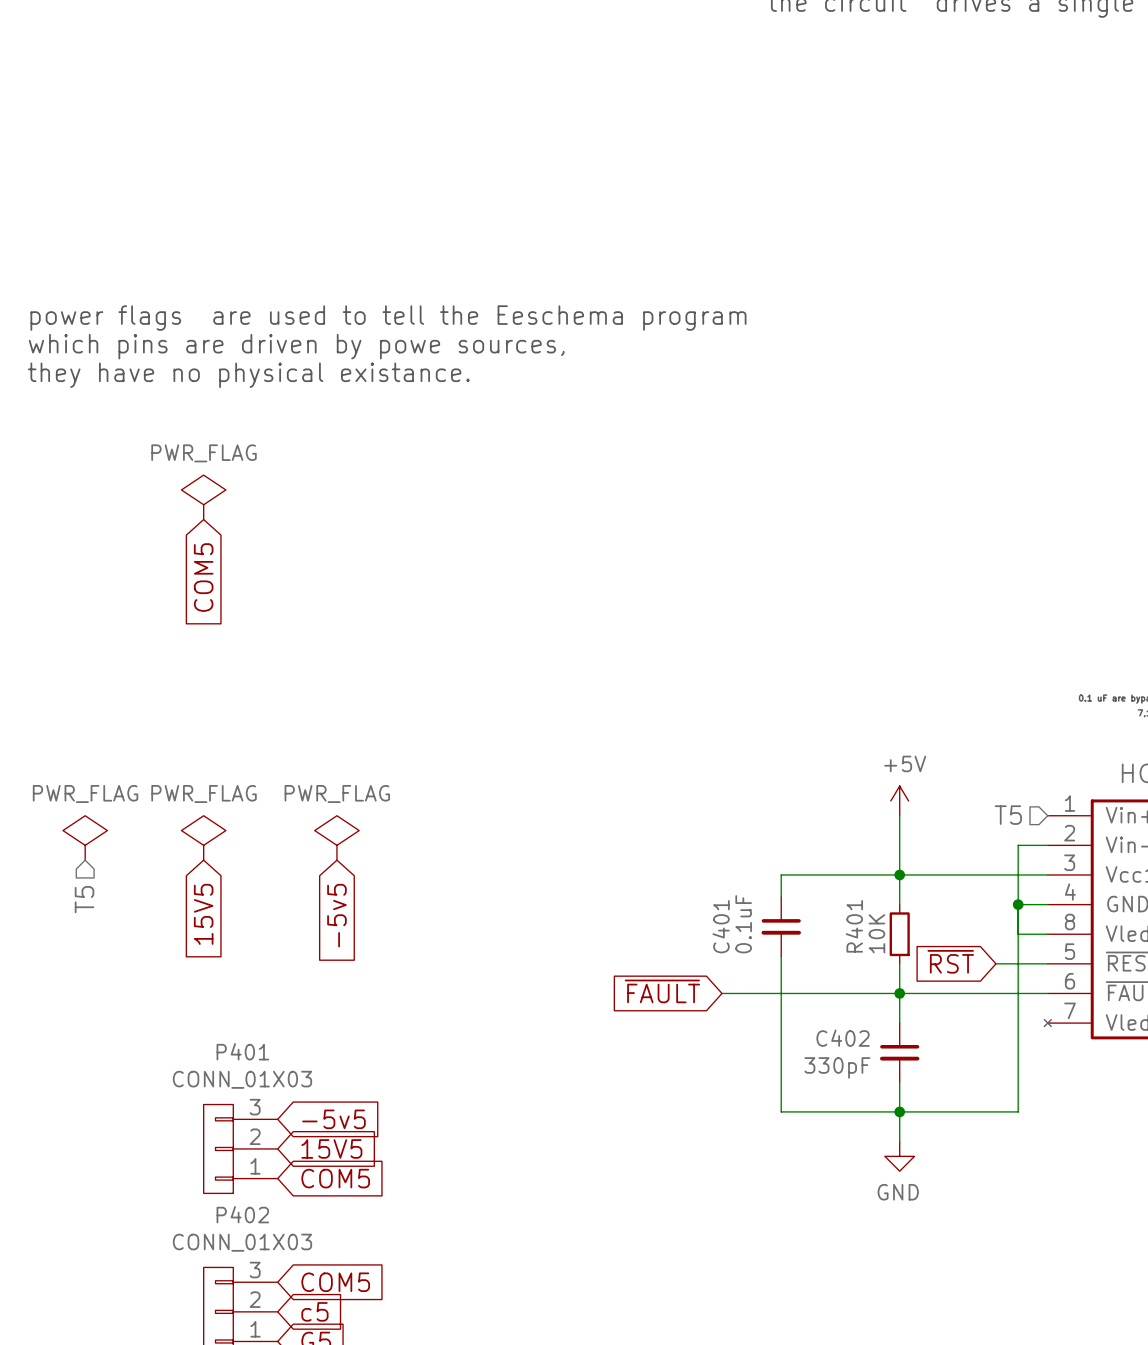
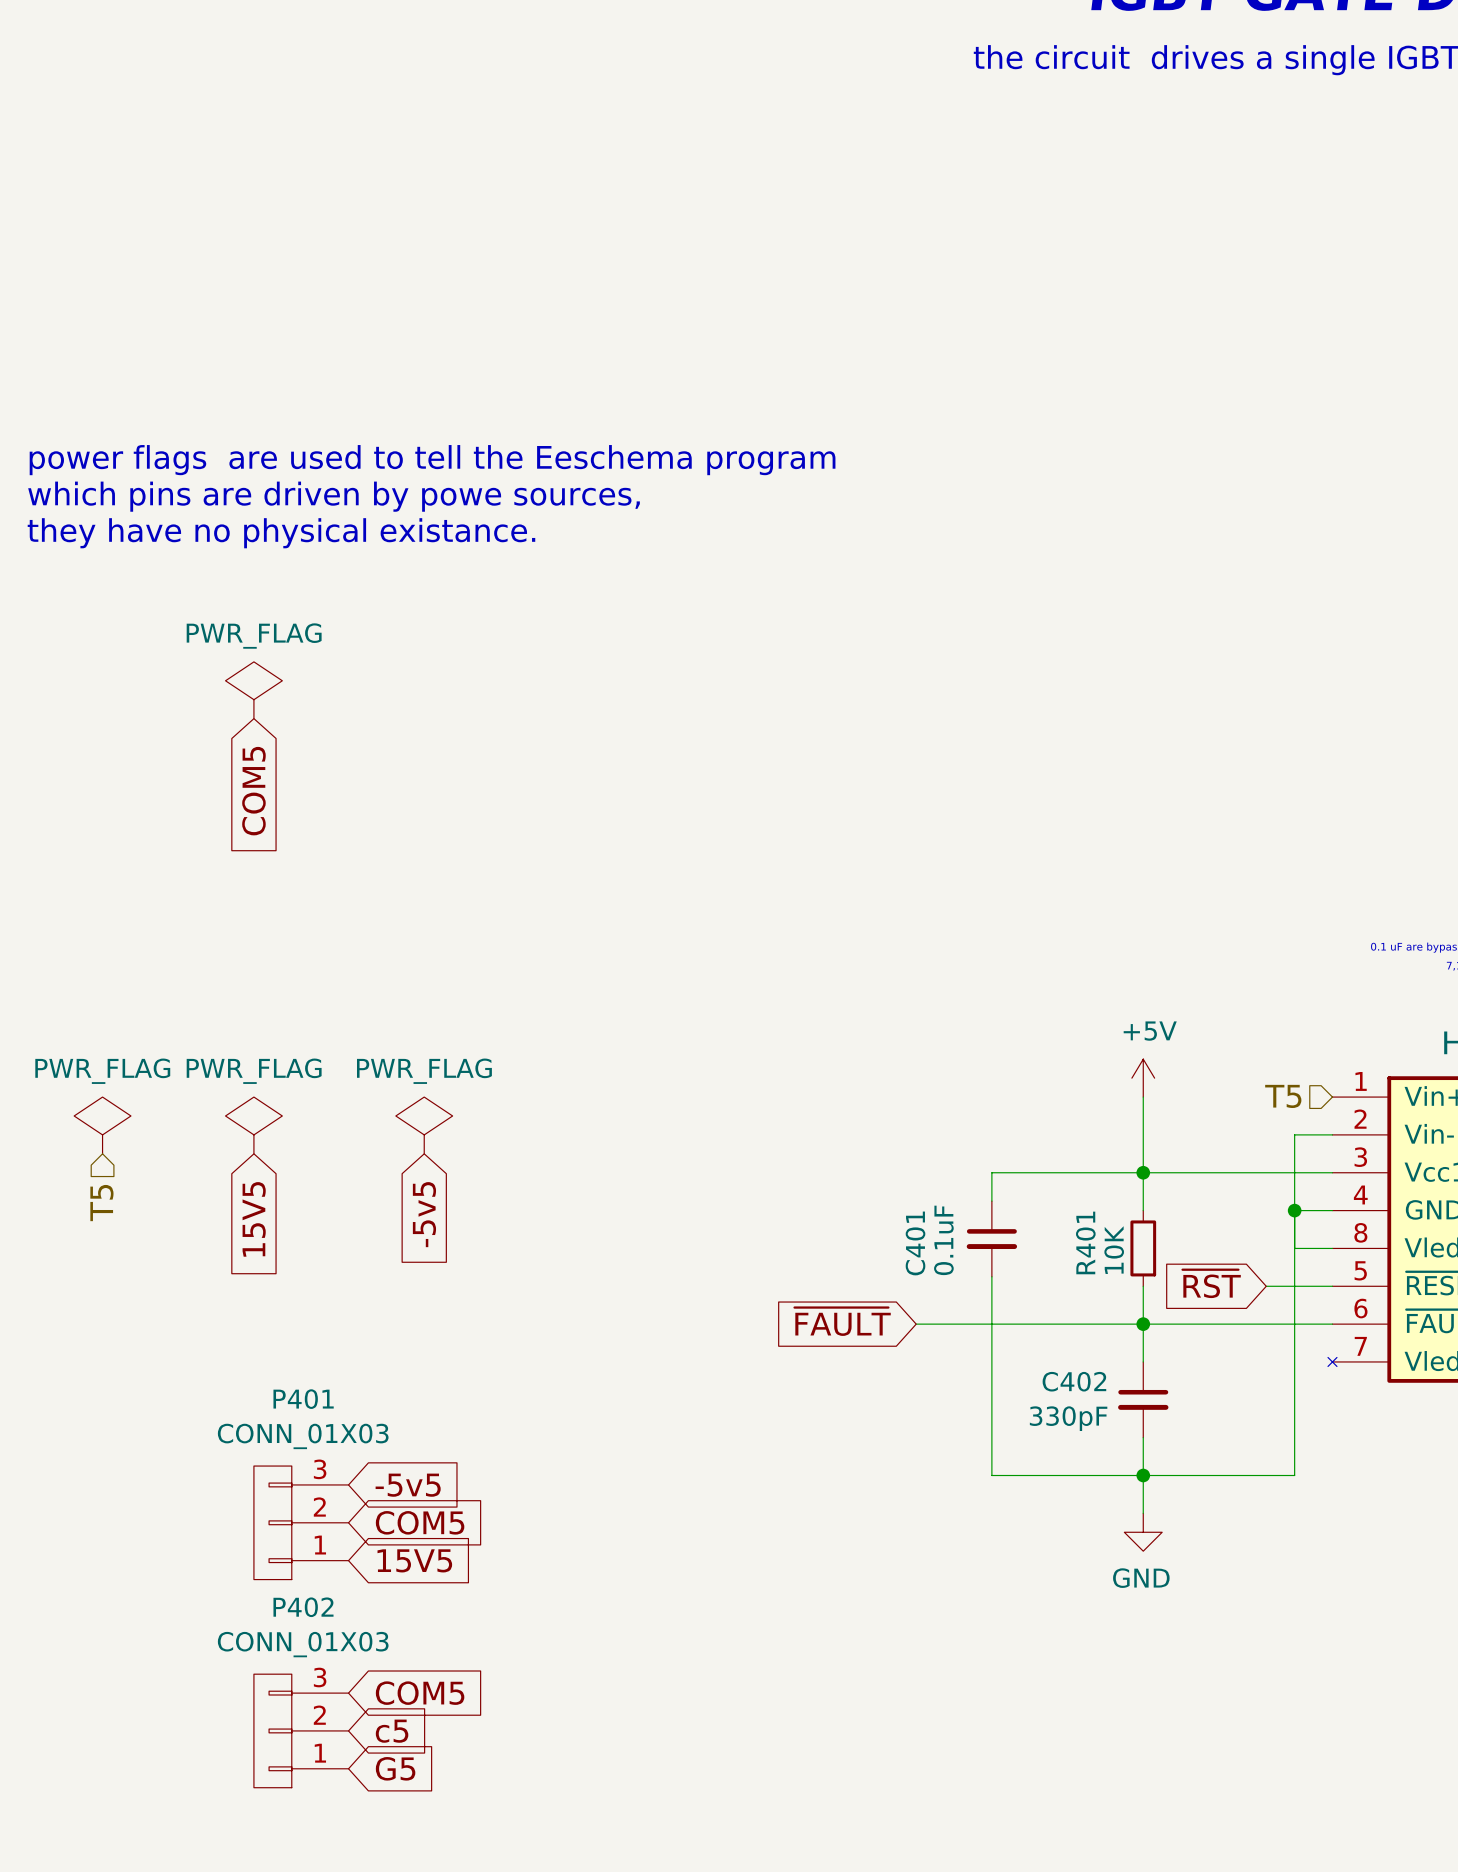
global label: 15V5 (331, 1148) -> COM5 (420, 1522)
global label: COM5 (335, 1178) -> 15V5 (414, 1560)

